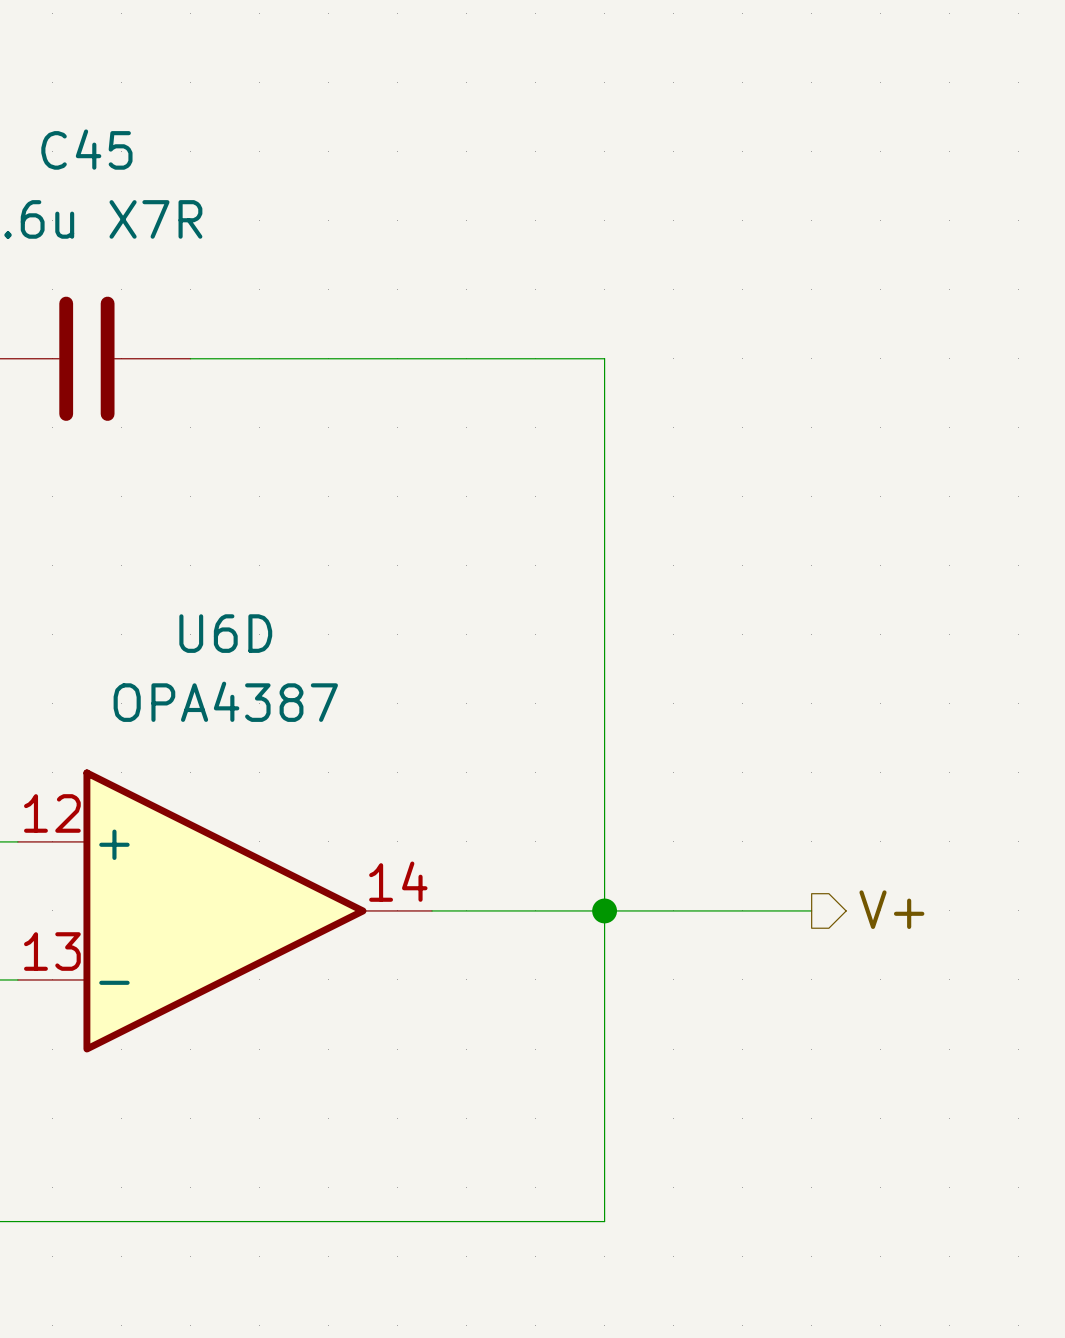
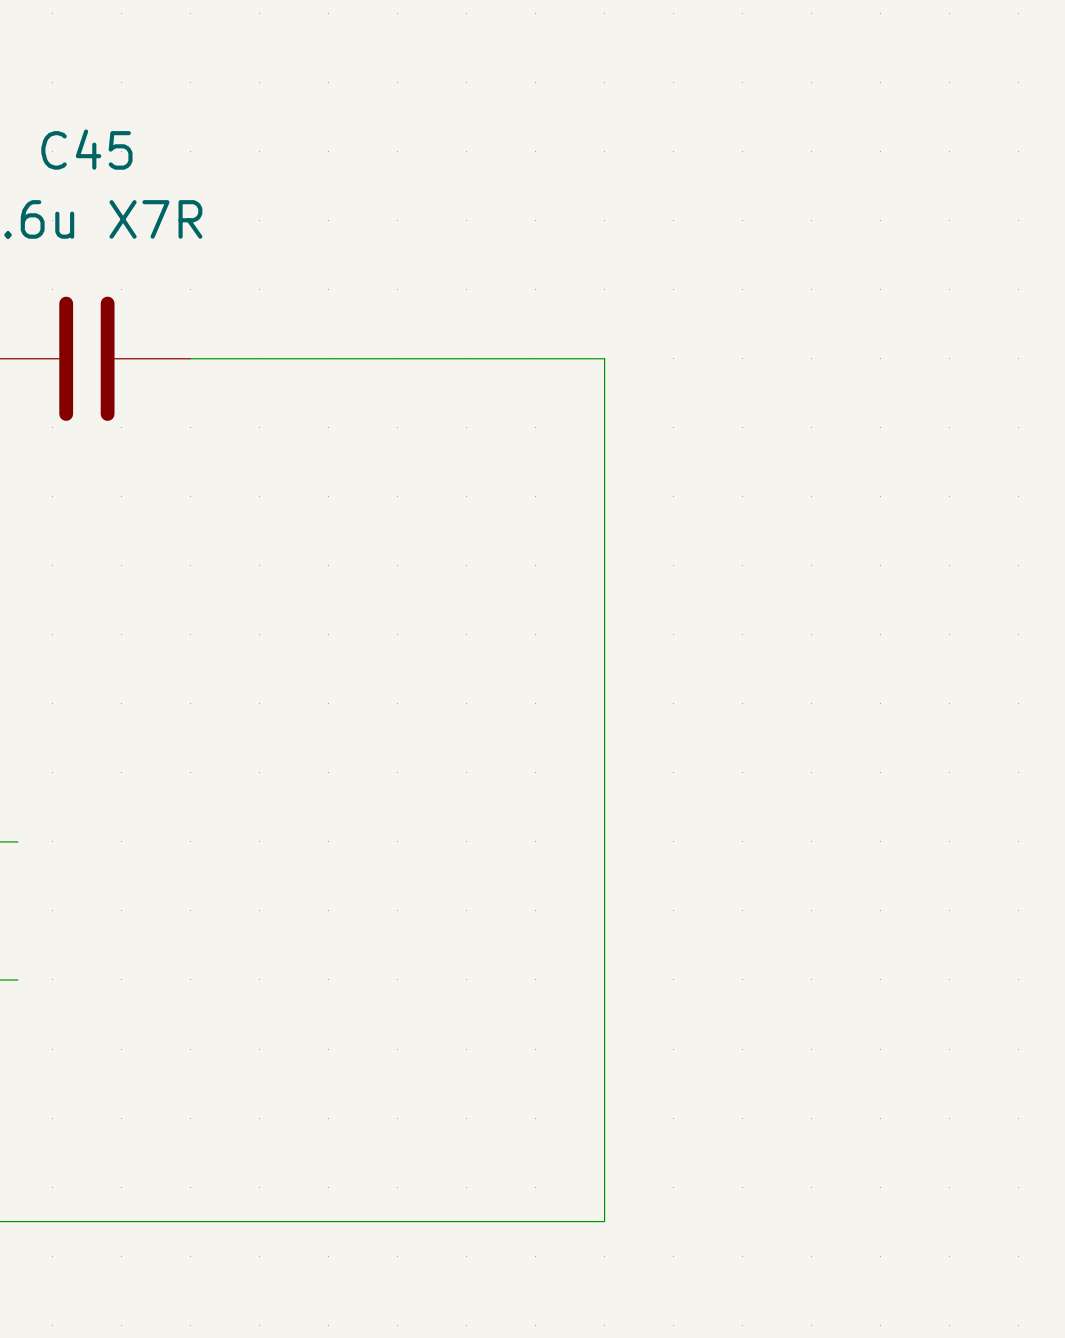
hierarchical label: V+ (891, 909) -> none
U6D: OPA4387 (224, 910) -> none
wire: (432, 910) (811, 910) -> none
junction: (604, 910) -> none

